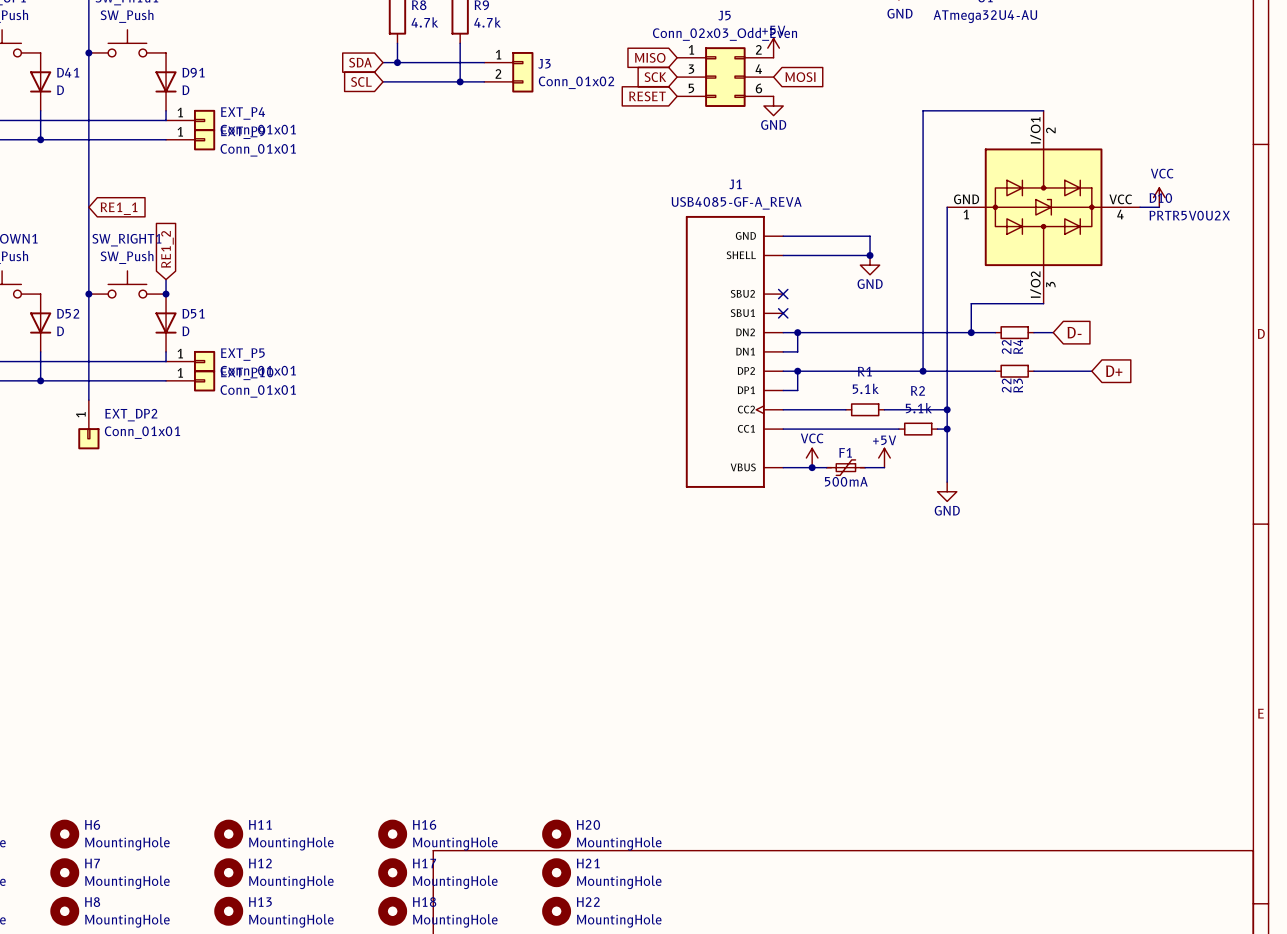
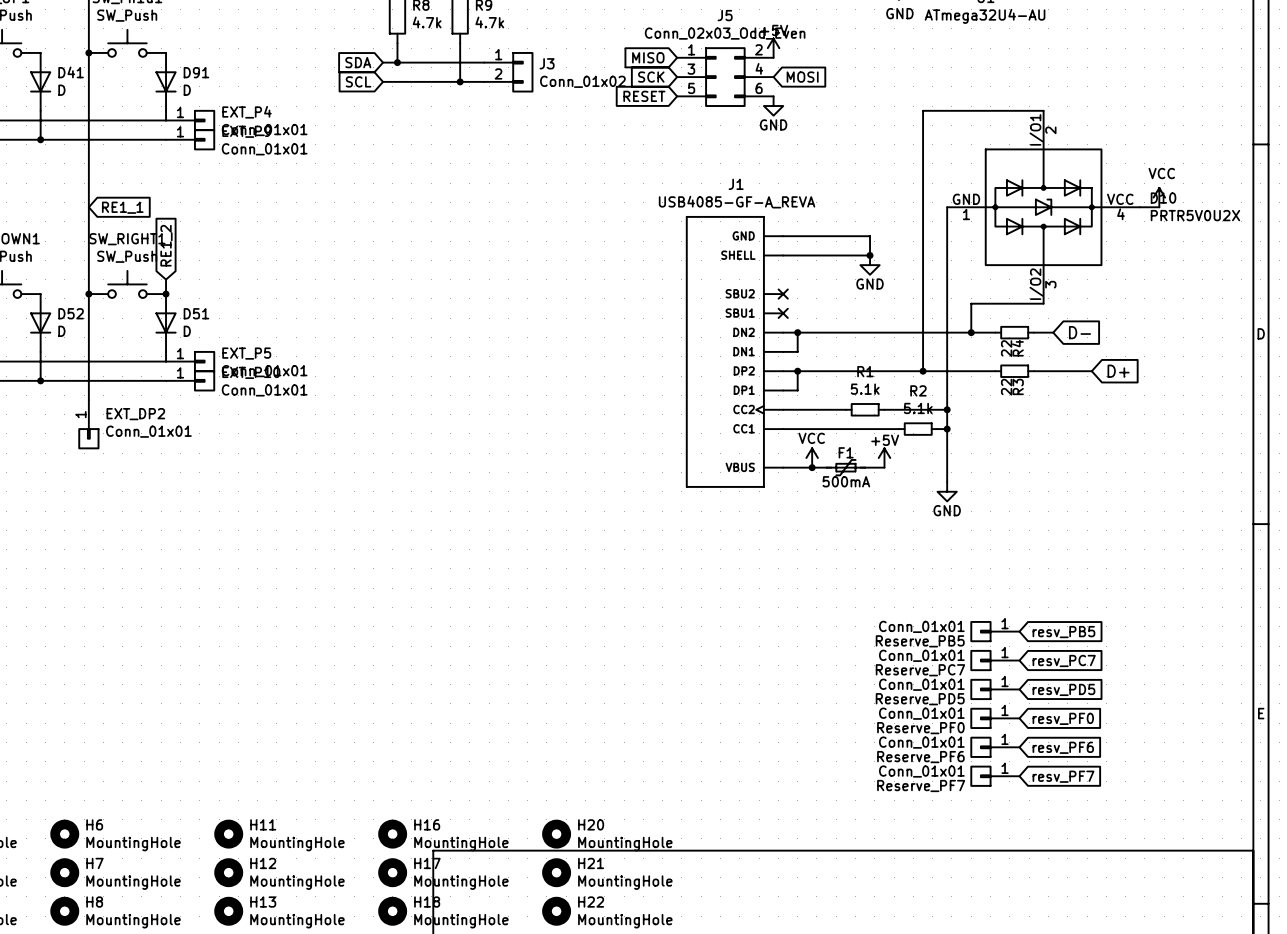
Reserve_PB5: none -> Conn_01x01 (994, 631)
global label: none -> resv_PB5 (1063, 632)
Reserve_PC7: none -> Conn_01x01 (994, 660)
global label: none -> resv_PC7 (1064, 660)
Reserve_PD5: none -> Conn_01x01 (994, 689)
global label: none -> resv_PD5 (1063, 689)
Reserve_PF0: none -> Conn_01x01 (994, 718)
global label: none -> resv_PF0 (1063, 718)
Reserve_PF6: none -> Conn_01x01 (994, 747)
global label: none -> resv_PF6 (1063, 747)
Reserve_PF7: none -> Conn_01x01 (994, 776)
global label: none -> resv_PF7 (1063, 776)

